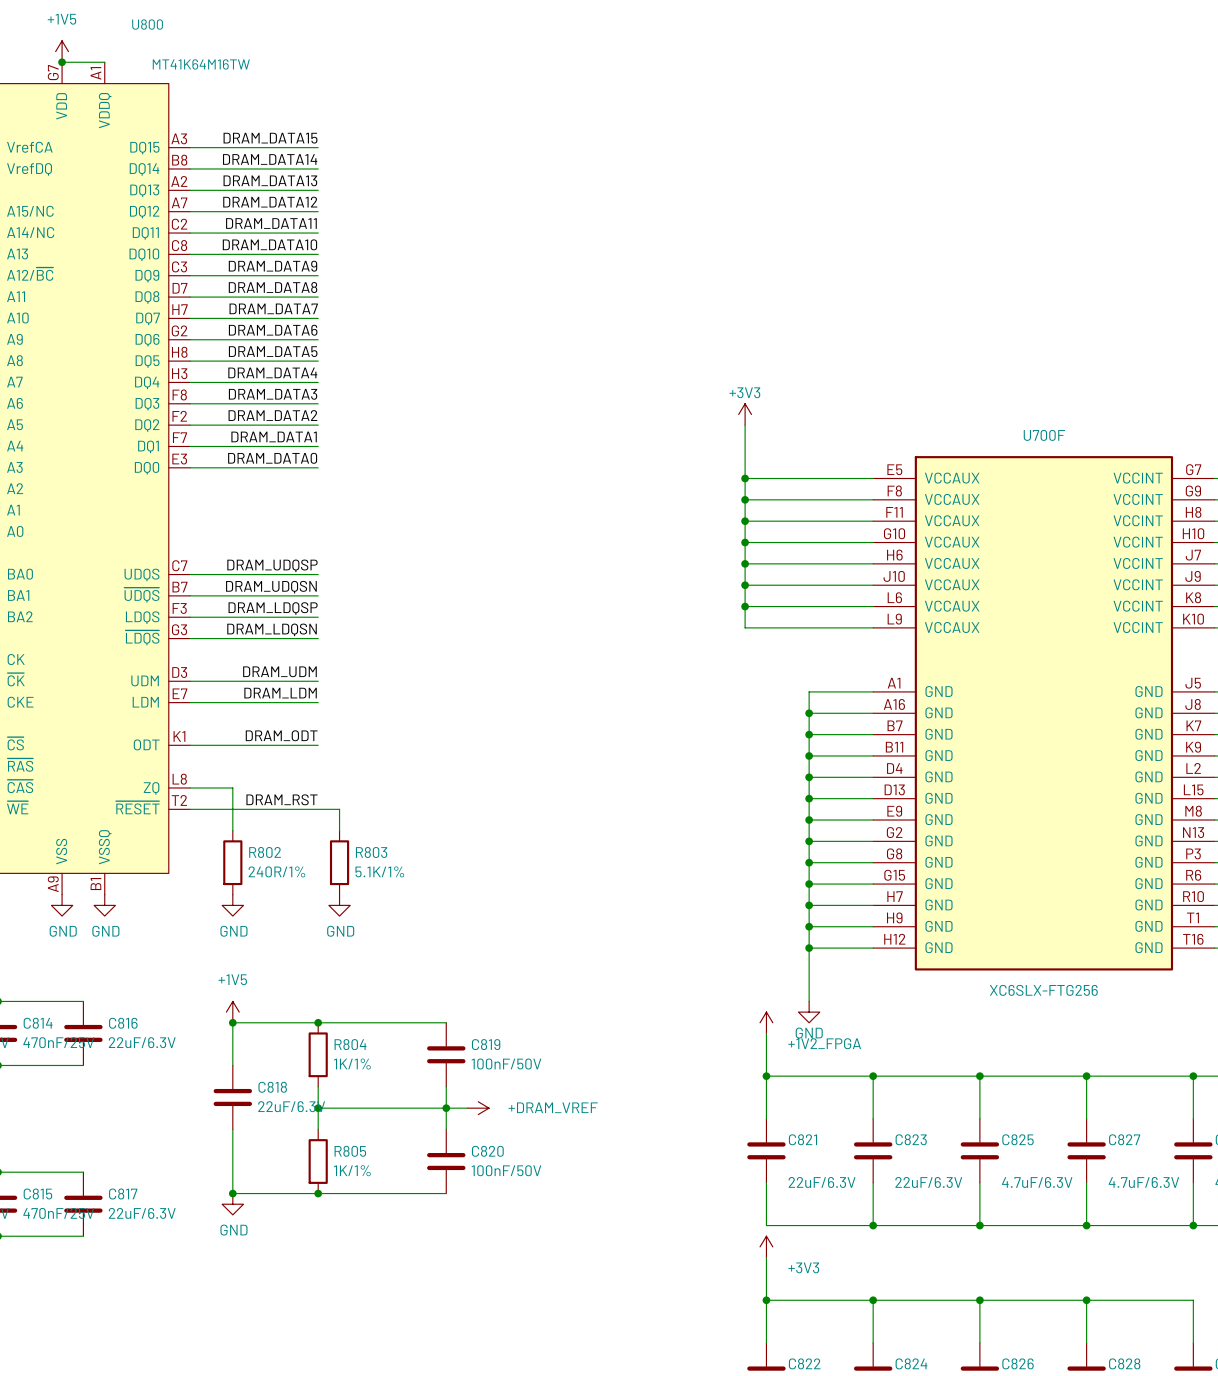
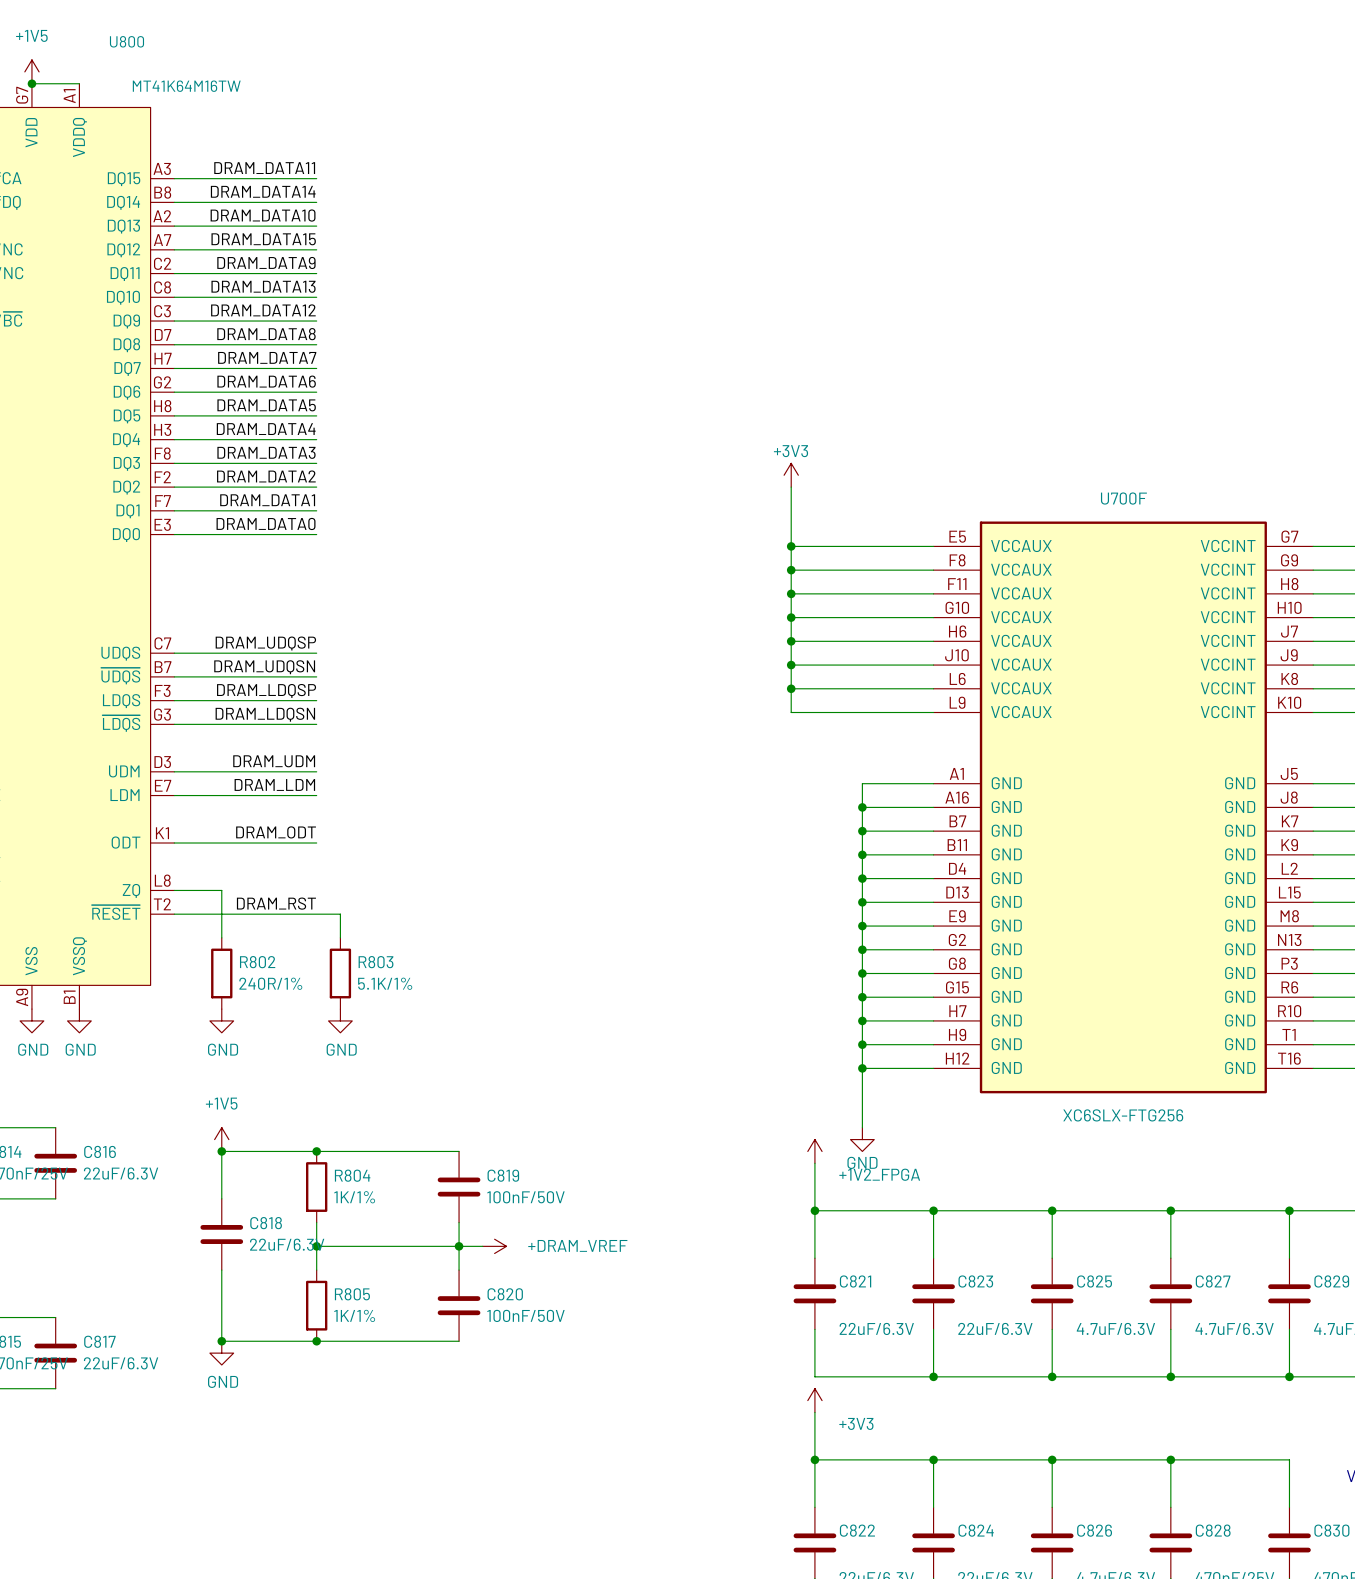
label: DRAM_DATA15 (270, 138) -> DRAM_DATA11 (264, 168)
label: DRAM_DATA13 (270, 180) -> DRAM_DATA10 (263, 215)
label: DRAM_DATA12 (270, 202) -> DRAM_DATA15 (263, 239)
label: DRAM_DATA11 (271, 223) -> DRAM_DATA9 (266, 262)
label: DRAM_DATA10 (269, 244) -> DRAM_DATA13 (263, 286)
label: DRAM_DATA9 (273, 266) -> DRAM_DATA12 (263, 310)

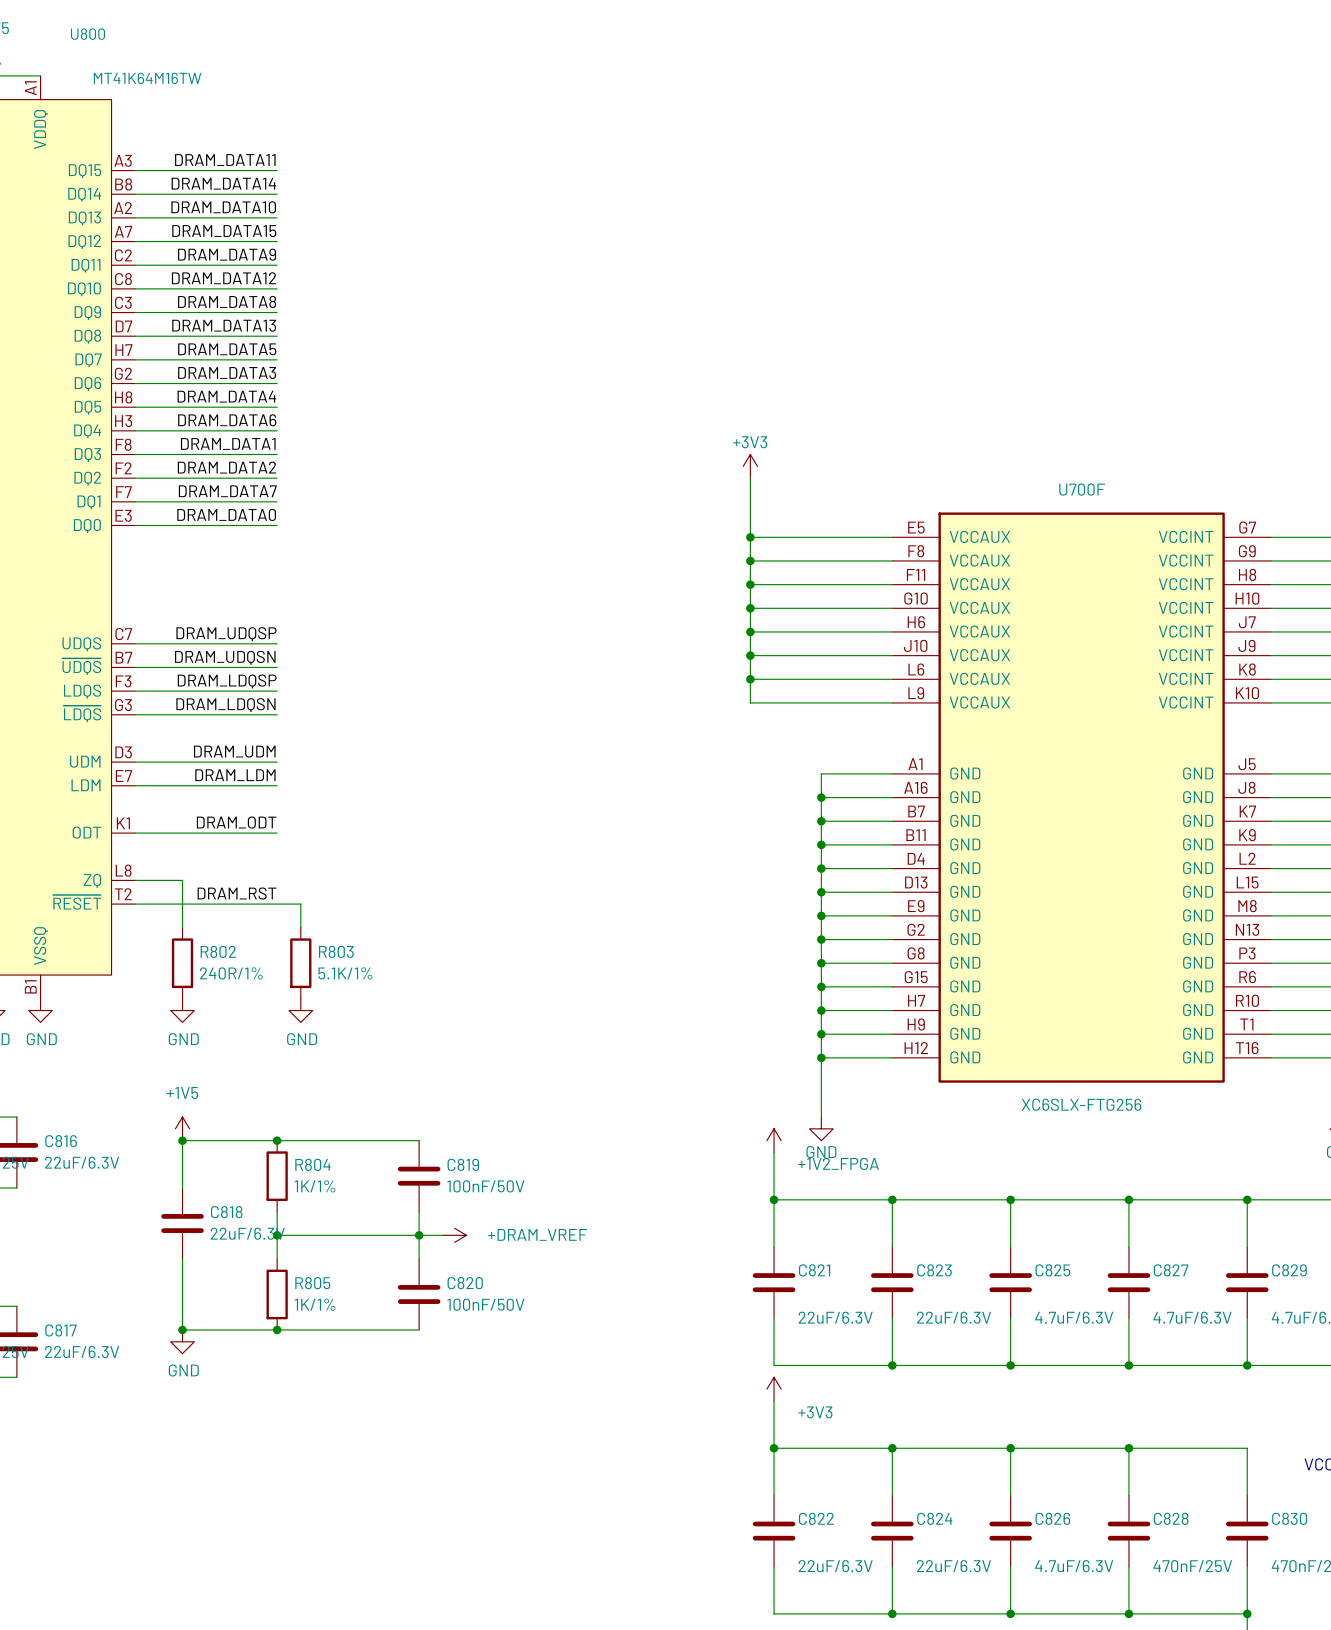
label: DRAM_DATA13 (263, 286) -> DRAM_DATA12 (224, 278)
label: DRAM_DATA12 (263, 310) -> DRAM_DATA8 (227, 301)
label: DRAM_DATA8 (266, 334) -> DRAM_DATA13 (224, 325)
label: DRAM_DATA7 (267, 357) -> DRAM_DATA5 (227, 349)
label: DRAM_DATA6 (266, 381) -> DRAM_DATA3 (227, 373)
label: DRAM_DATA5 (266, 405) -> DRAM_DATA4 (226, 396)
label: DRAM_DATA4 (266, 429) -> DRAM_DATA6 (227, 420)
label: DRAM_DATA3 (266, 452) -> DRAM_DATA1 (228, 443)
label: DRAM_DATA1 (267, 500) -> DRAM_DATA7 (227, 491)

